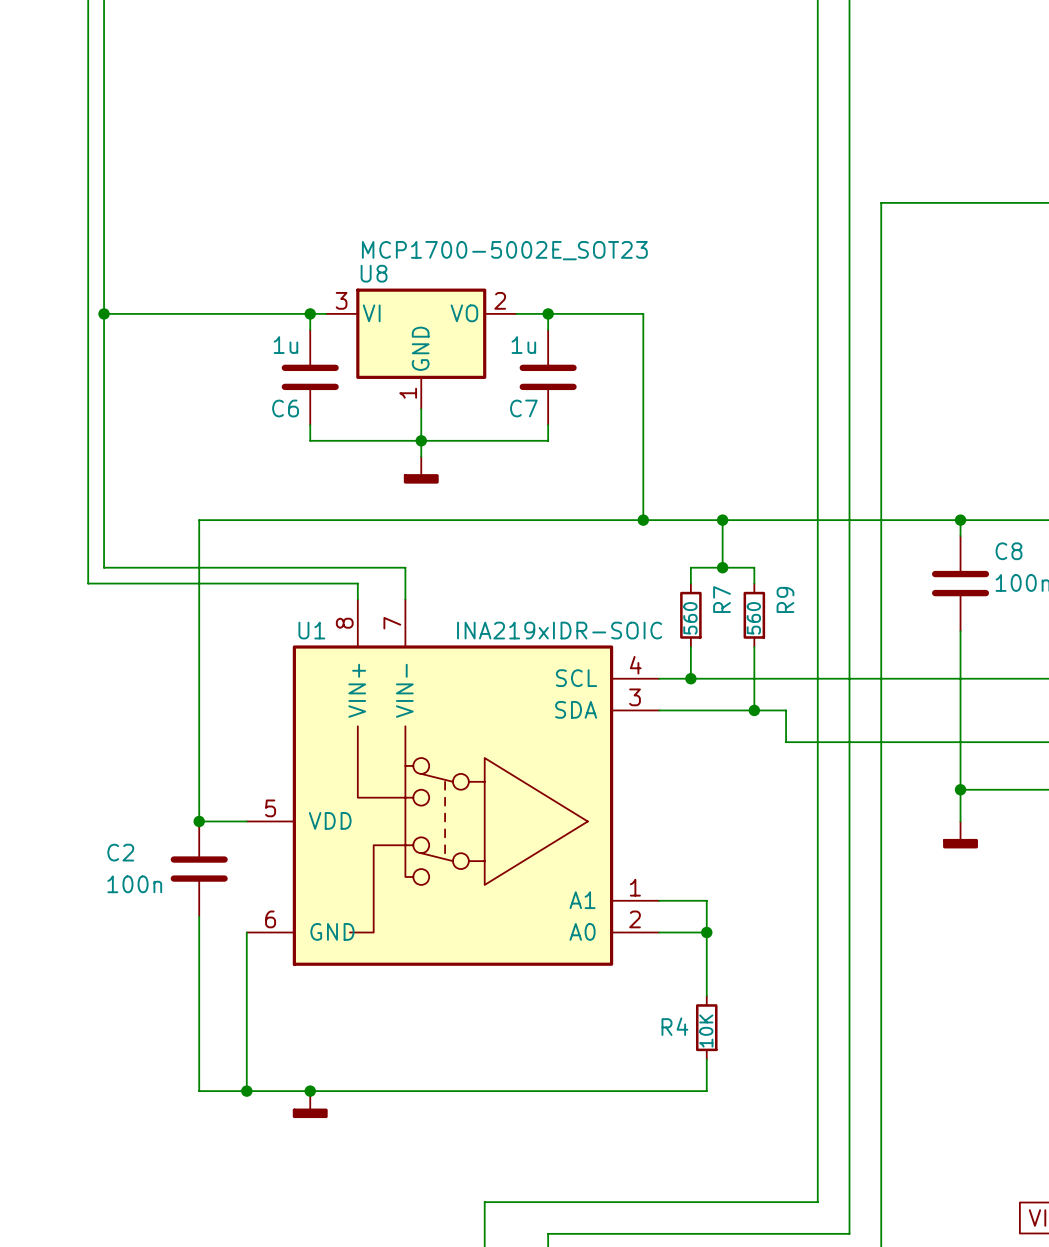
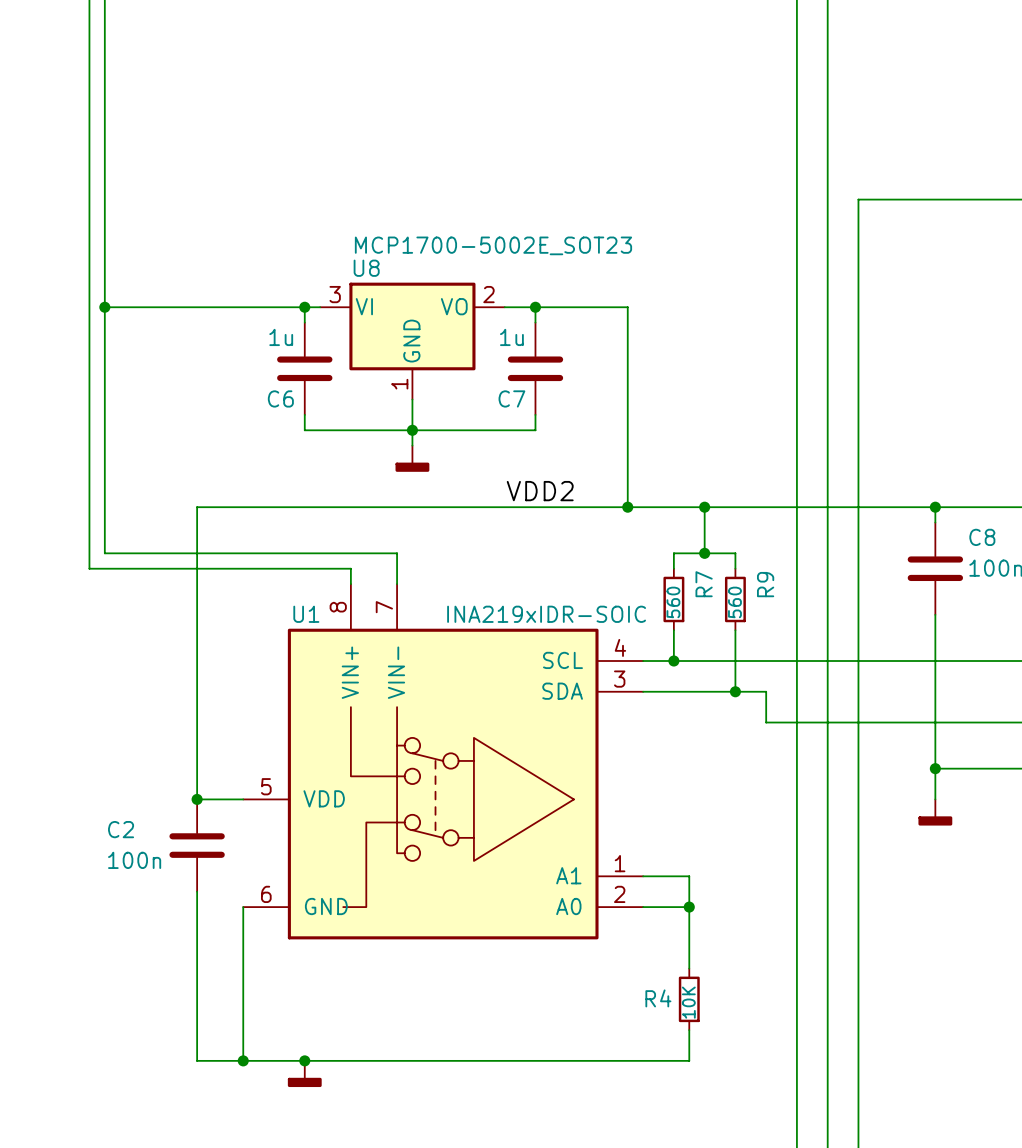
label: none -> VDD2 (540, 491)

